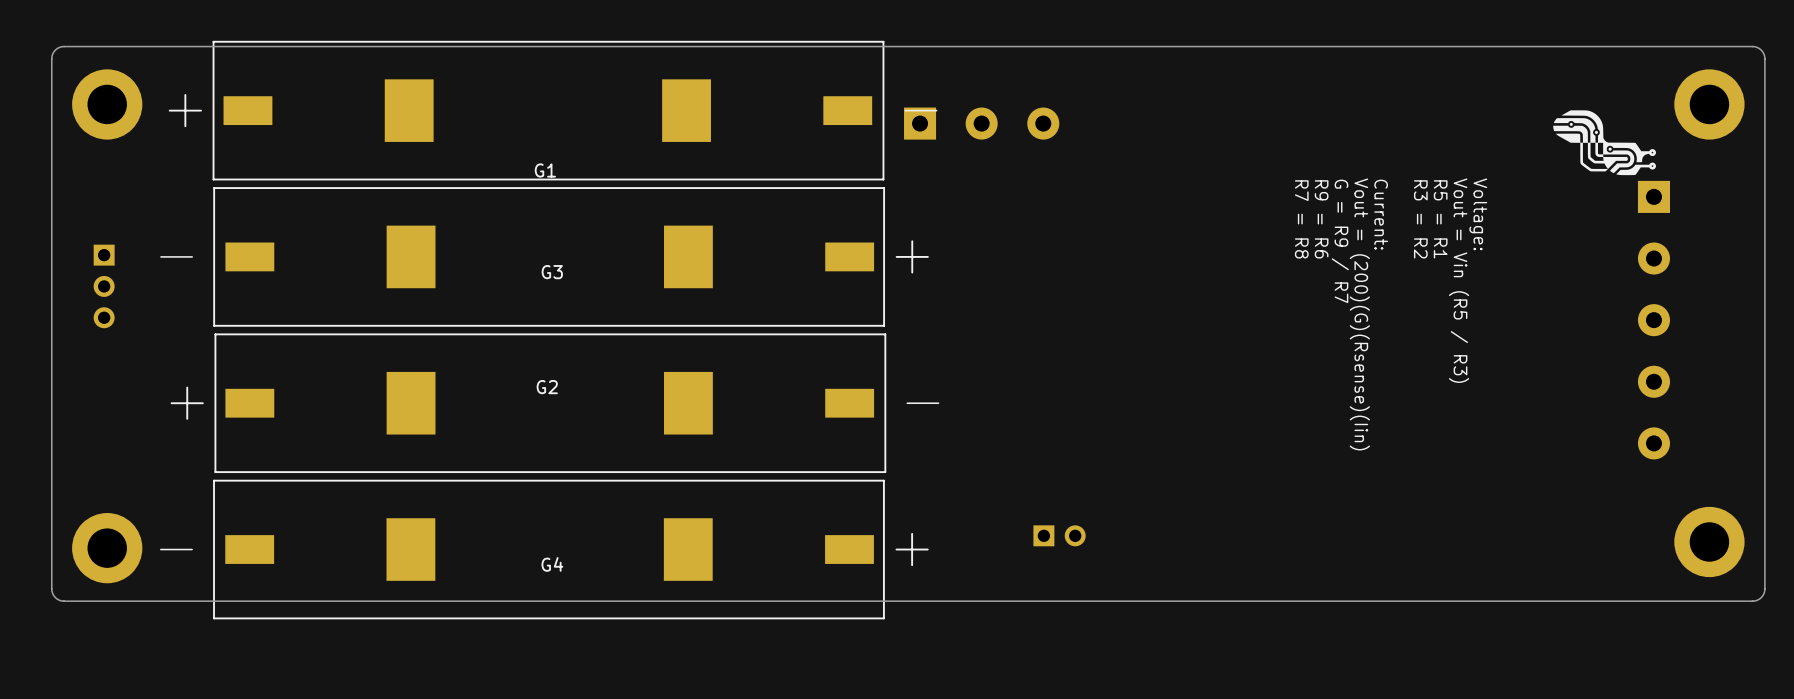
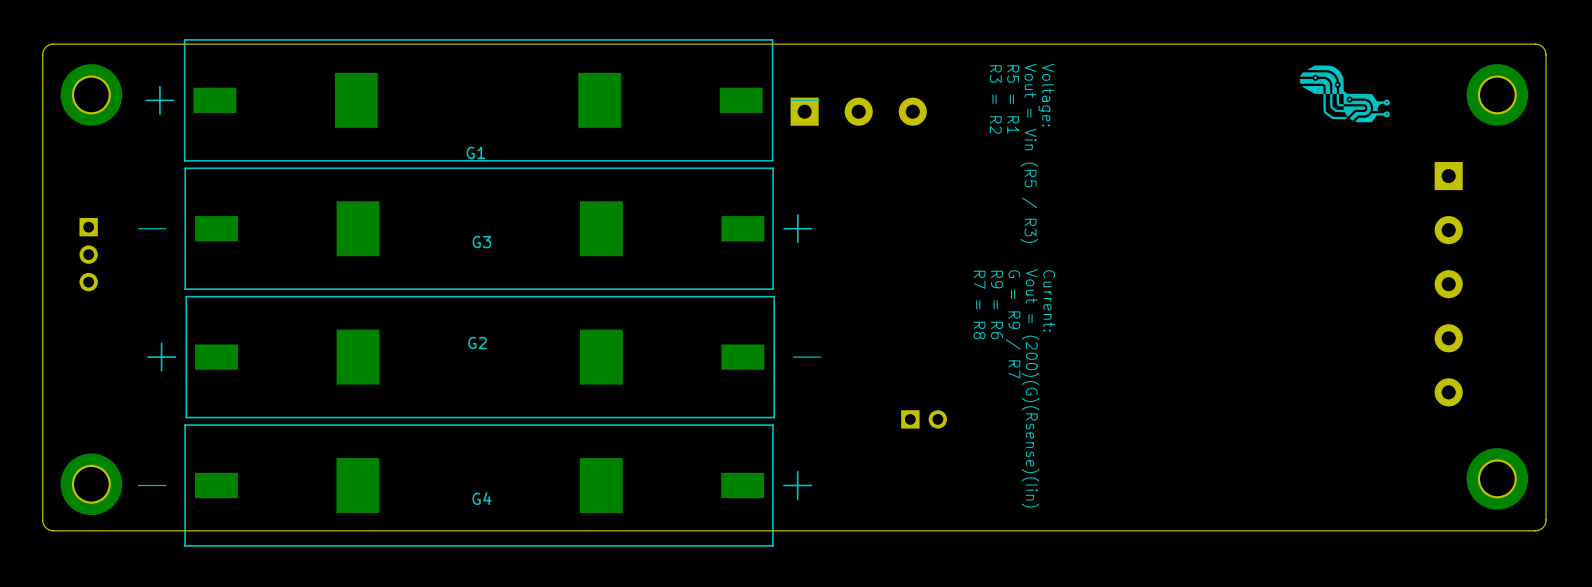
drawing position: (1604, 142) -> (1344, 93)
text position: Current: (1381, 214) -> Current: (1049, 300)
text position: Voltage: (1478, 214) -> Voltage: (1046, 95)
text position: R7 = R8 (1301, 219) -> R7 = R8 (979, 305)
text position: R9 = R6 (1321, 219) -> R9 = R6 (996, 305)
text position: R3 = R2 (1420, 219) -> R3 = R2 (995, 99)
text position: R5 = R1 (1440, 219) -> R5 = R1 (1013, 99)
text position: G = R9 / R7 (1340, 241) -> G = R9 / R7 (1013, 324)
text position: Vout = Vin (R5 / R3) (1459, 280) -> Vout = Vin (R5 / R3) (1029, 153)
text position: Vout = (200)(G)(Rsense)(Iin) (1359, 314) -> Vout = (200)(G)(Rsense)(Iin) (1030, 388)
part position: (1059, 535) -> (924, 419)

